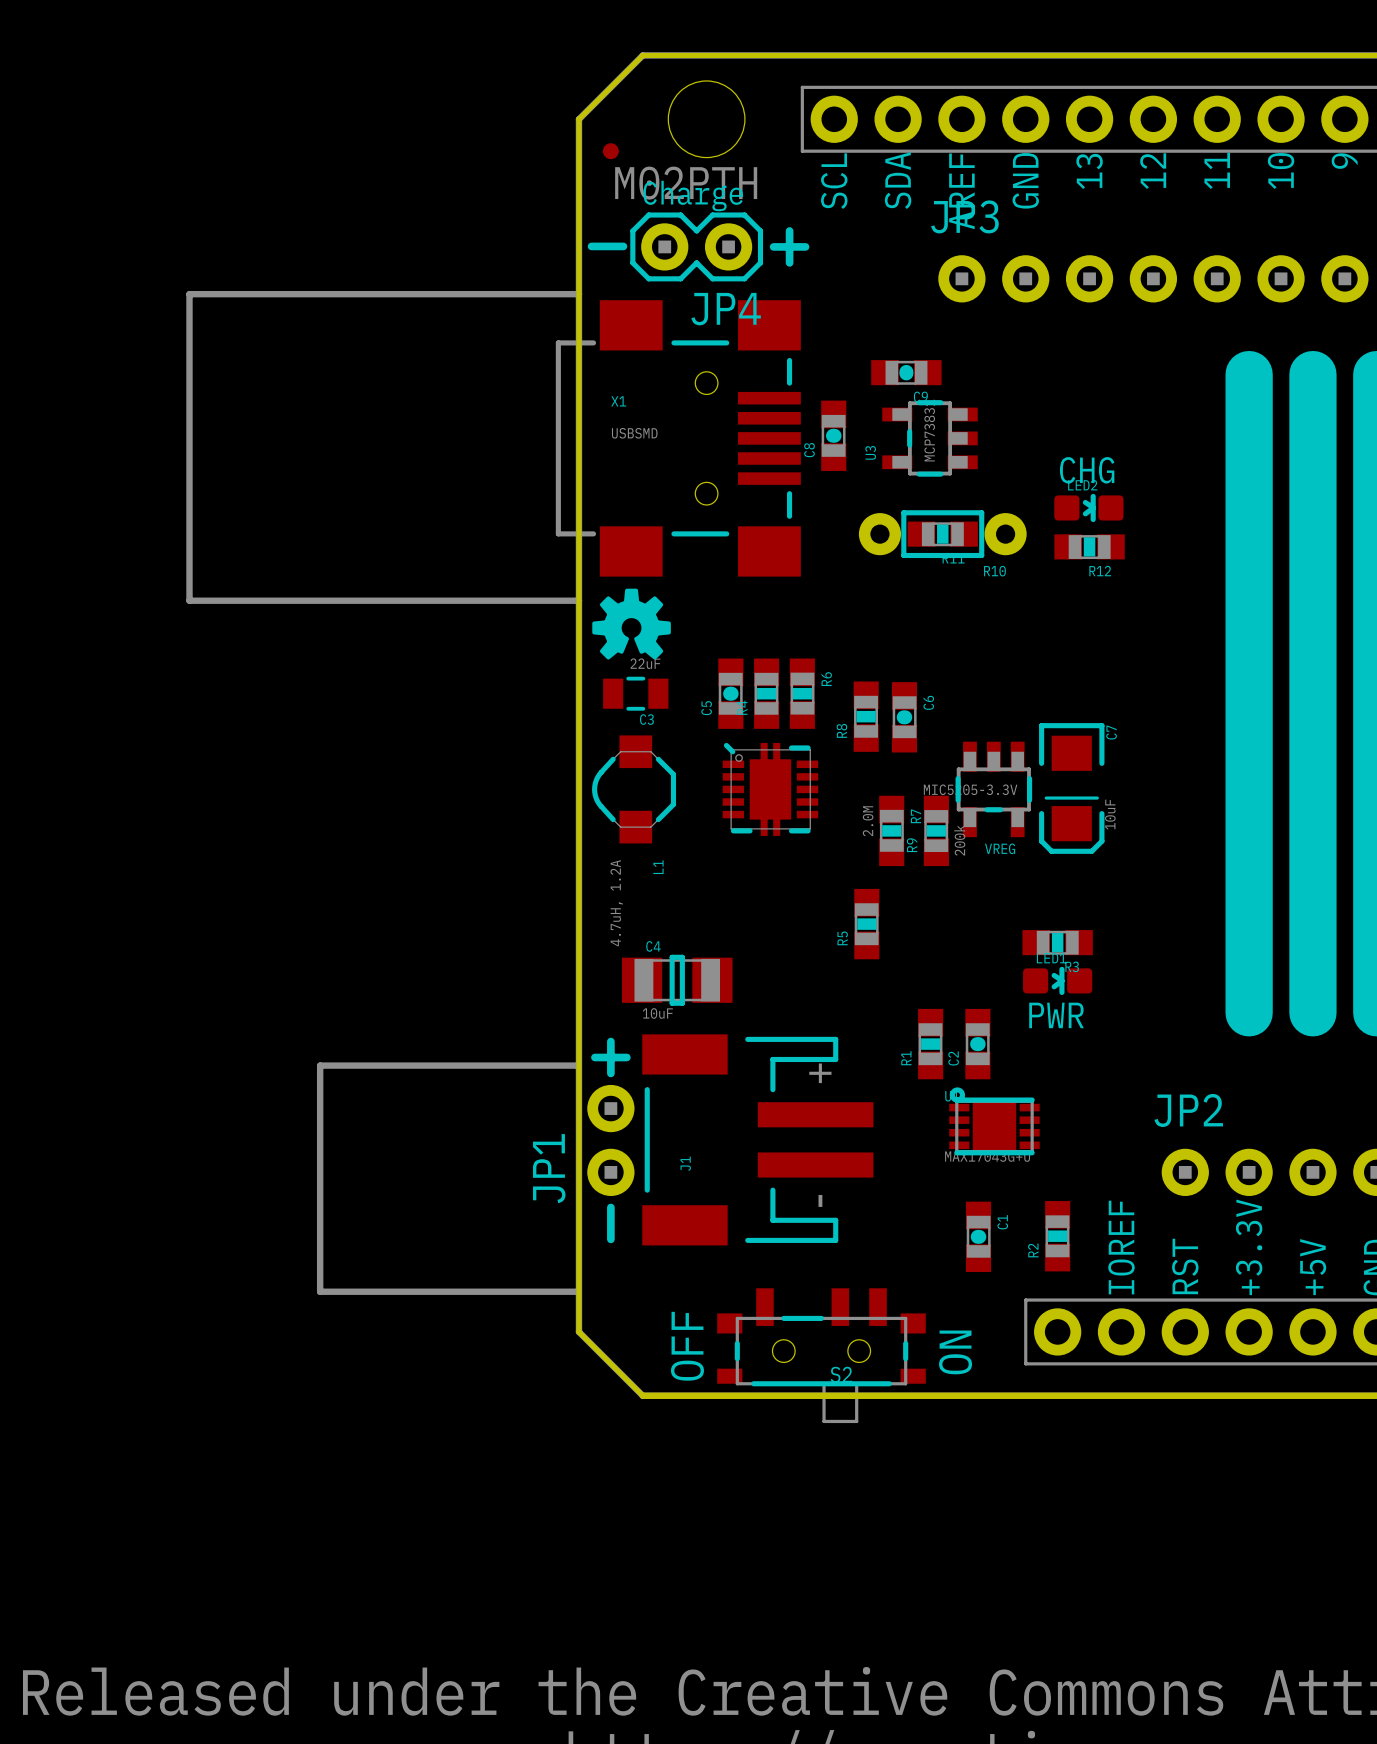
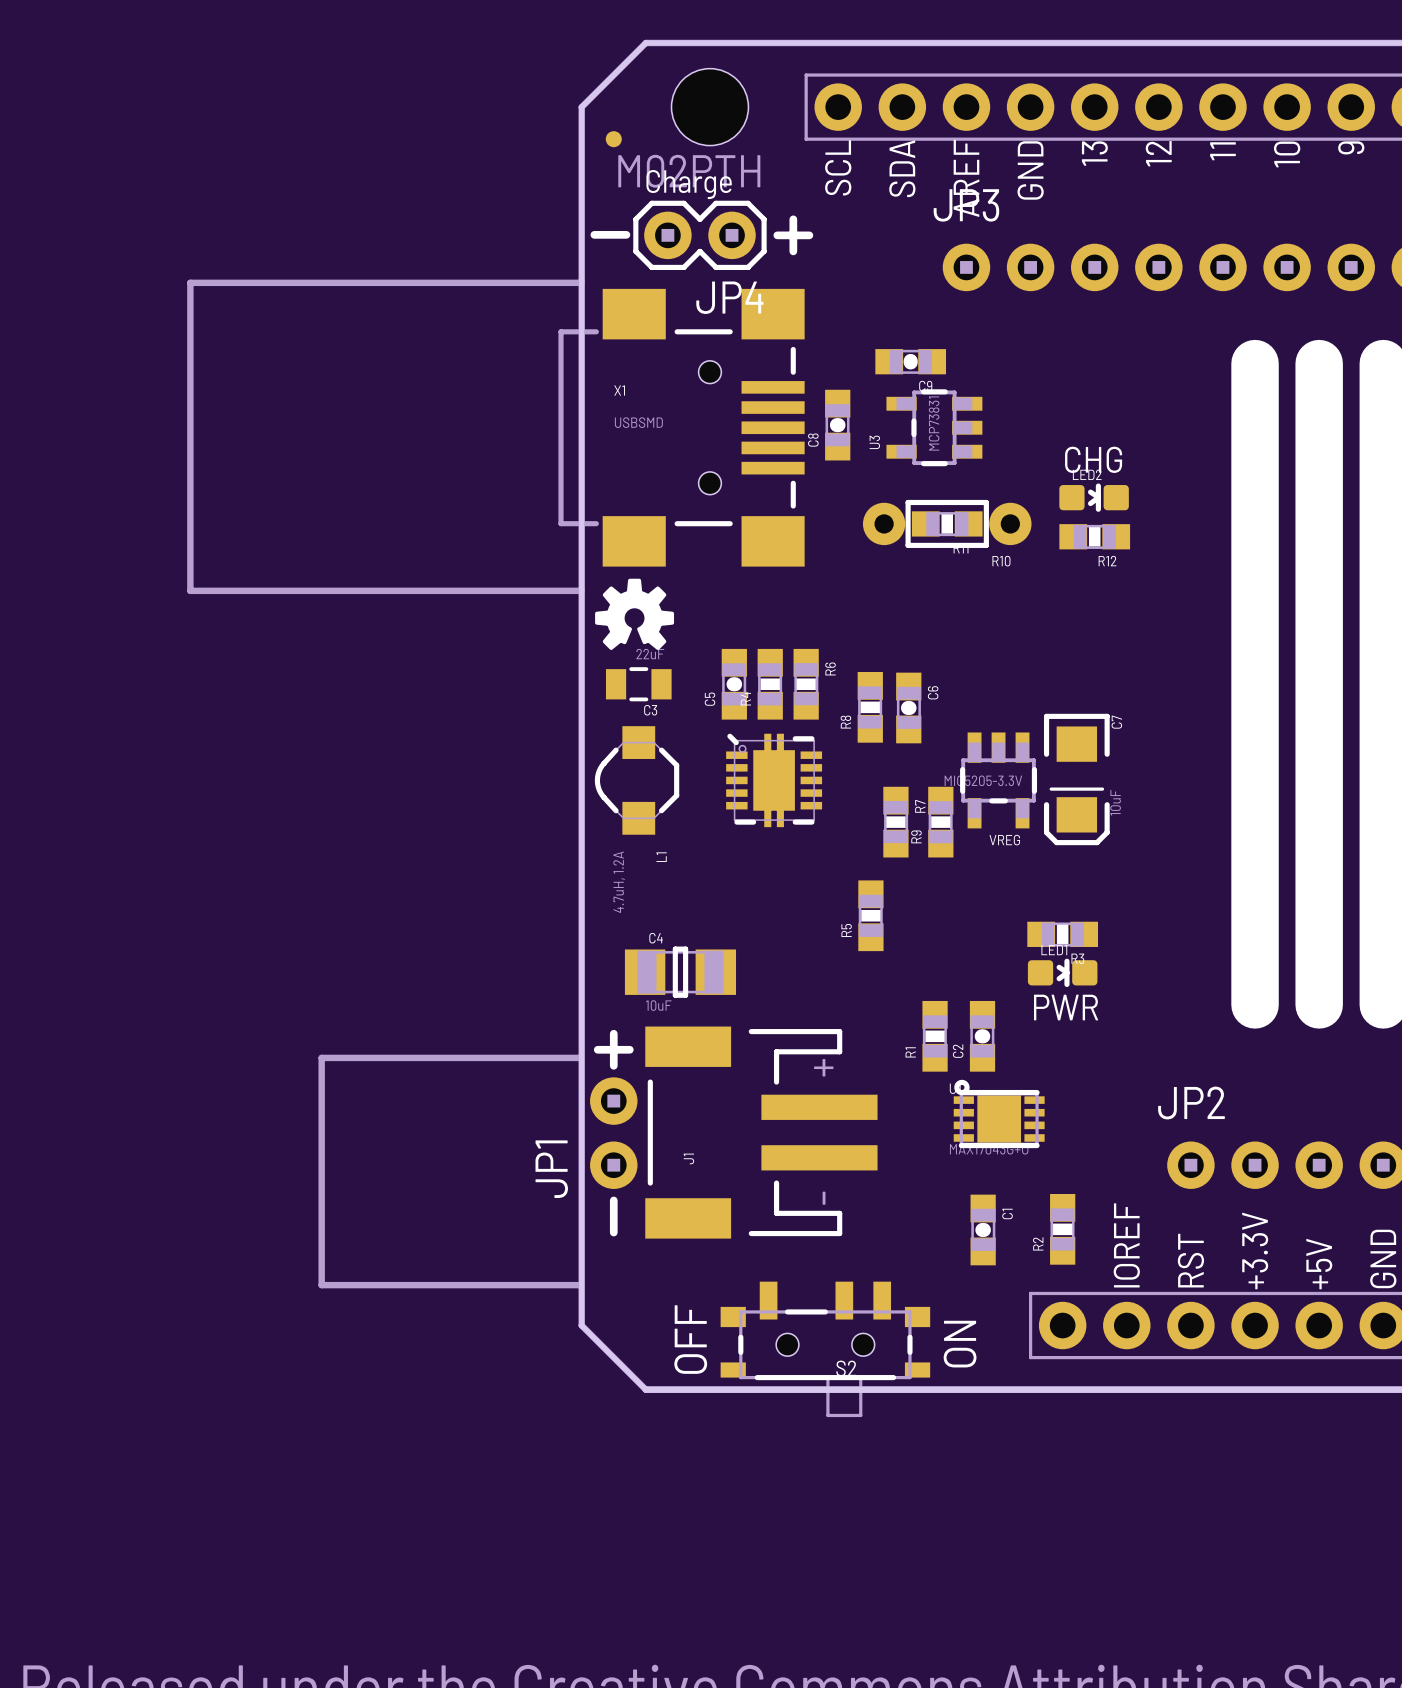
R7 value: 2.0M (868, 821) -> none
R9 value: 200k (959, 840) -> none

